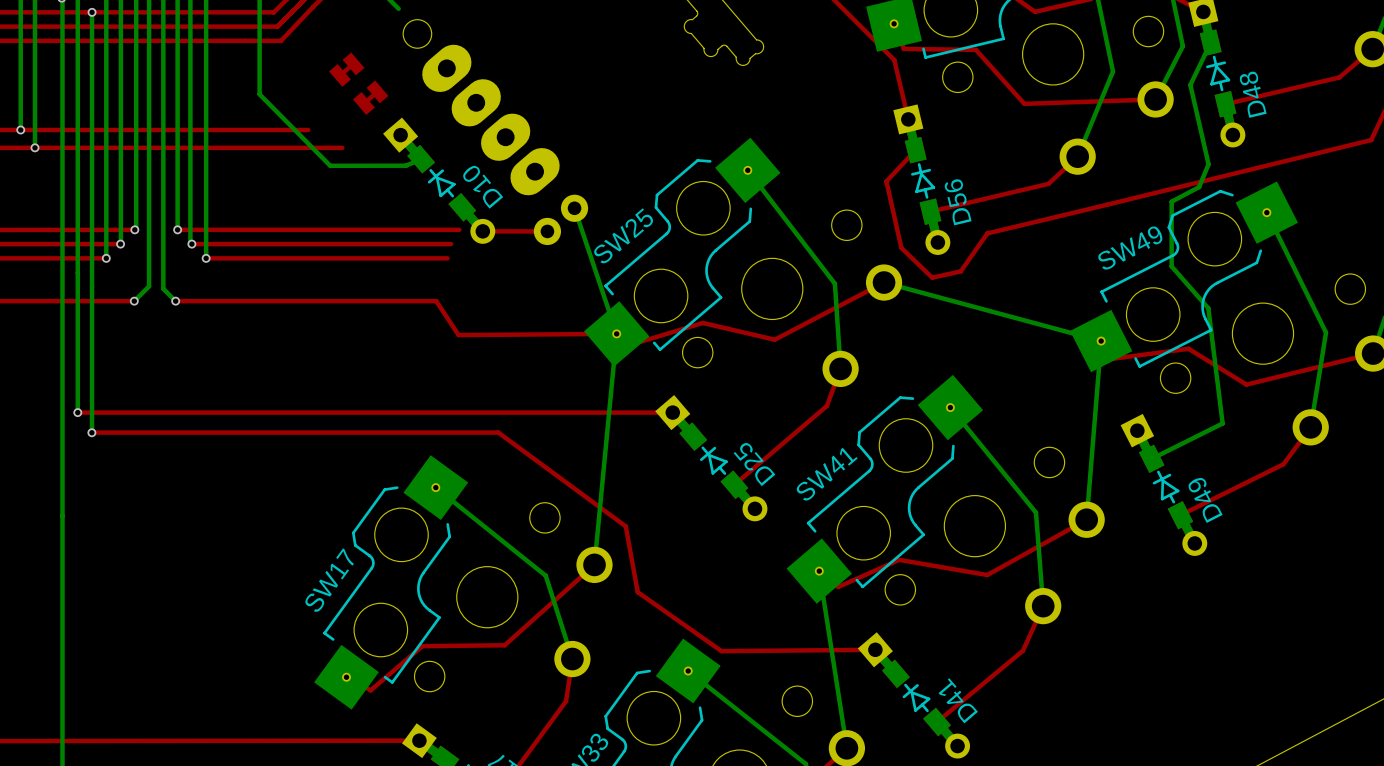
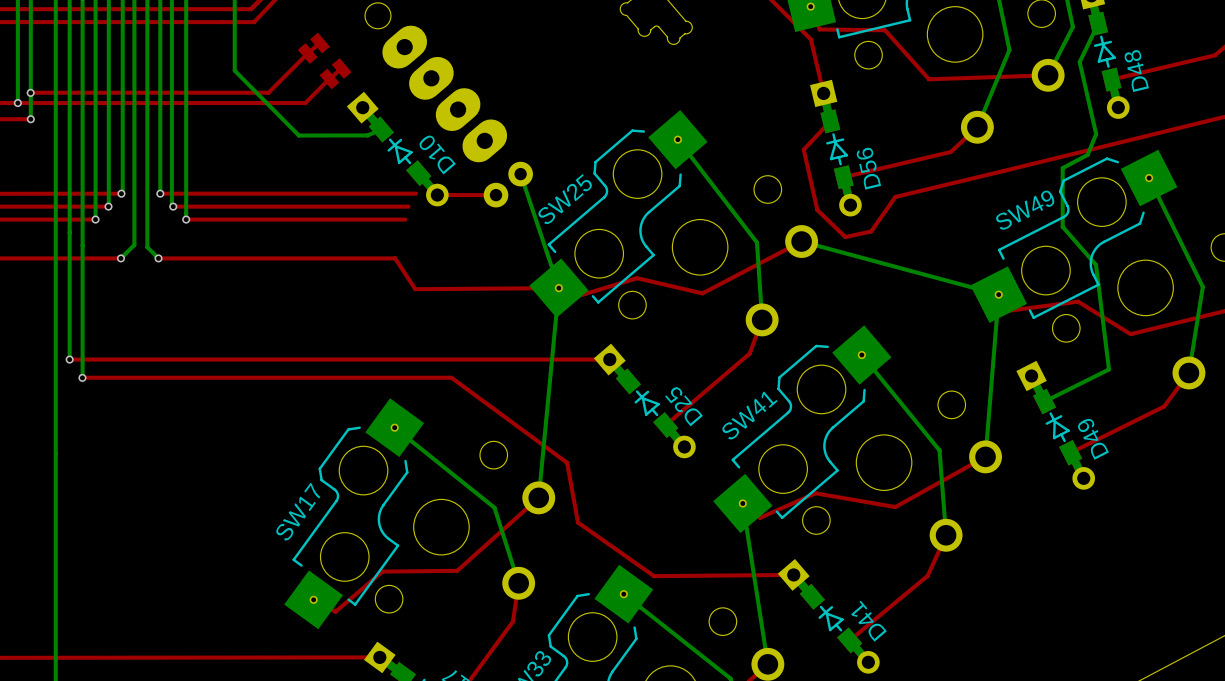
top track: none -> (307, 53) (268, 92) (30, 92)
top track: none -> (329, 78) (305, 103) (278, 103)
via: none -> (30, 92)
top track: (342, 147) (35, 147) -> none

